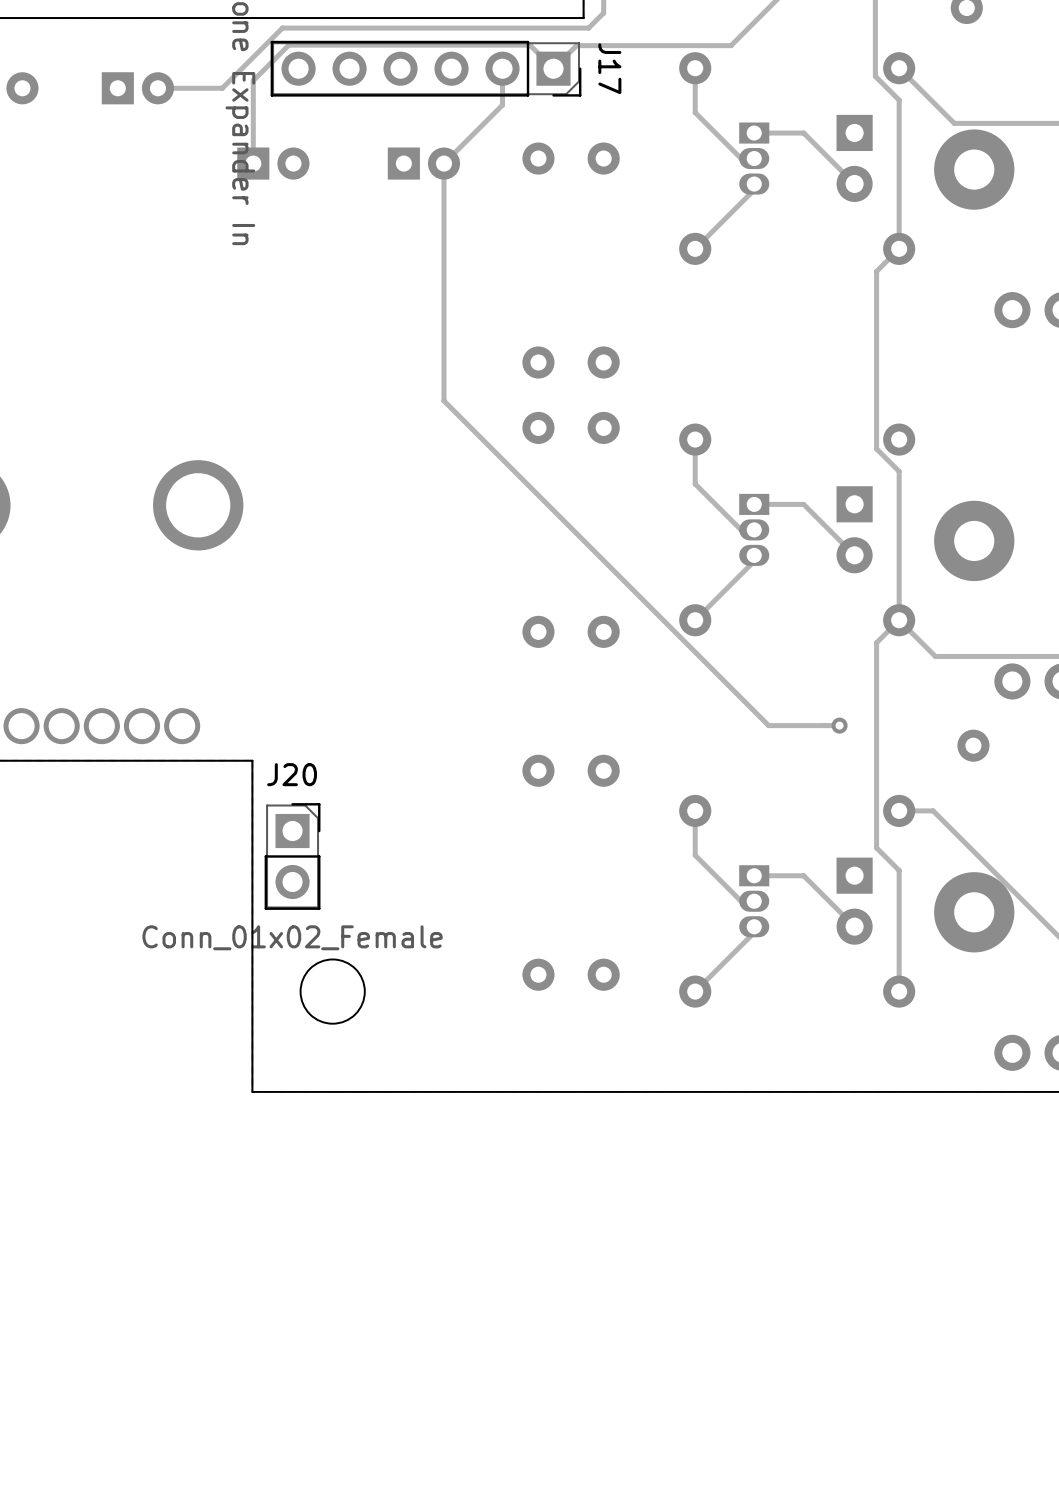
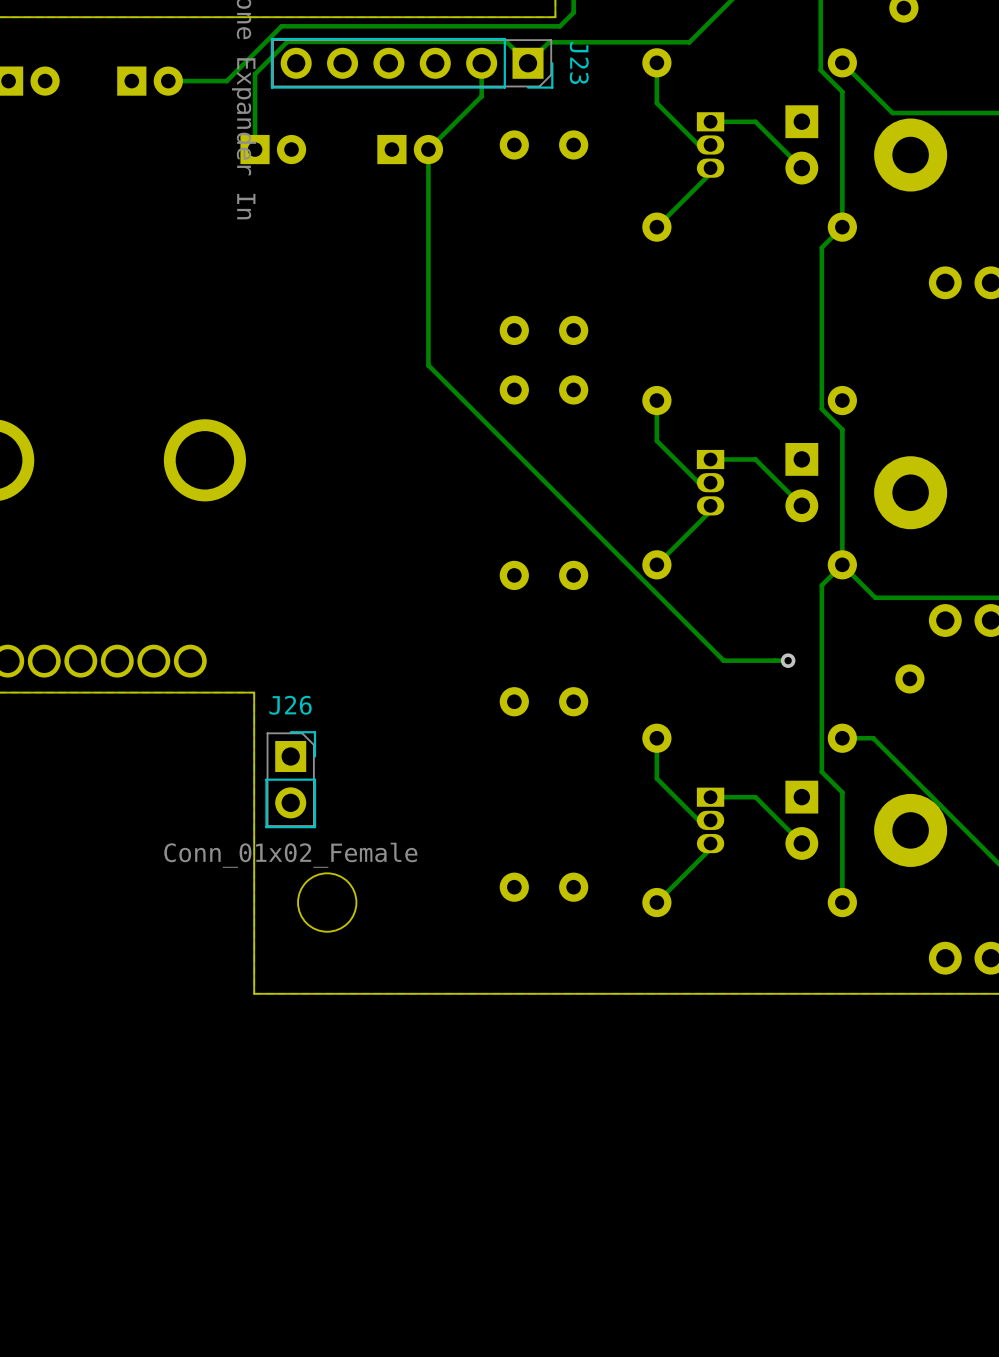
J17 name: J17 (609, 68) -> J23 (579, 63)
J20 name: J20 (292, 774) -> J26 (290, 705)

